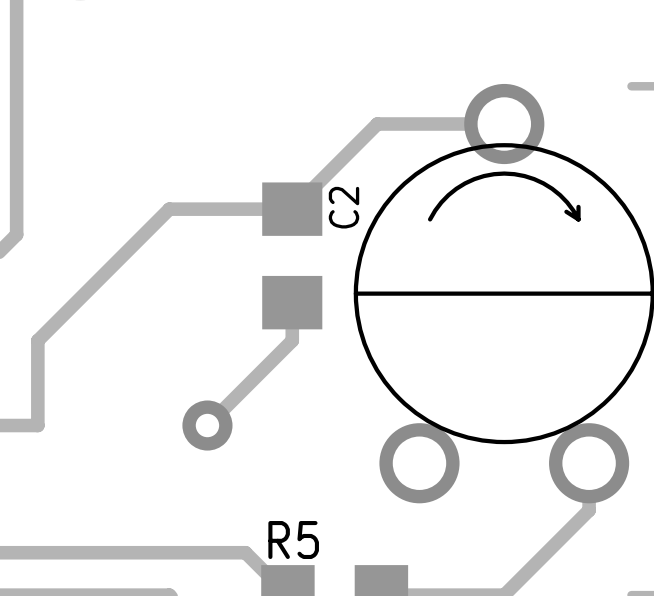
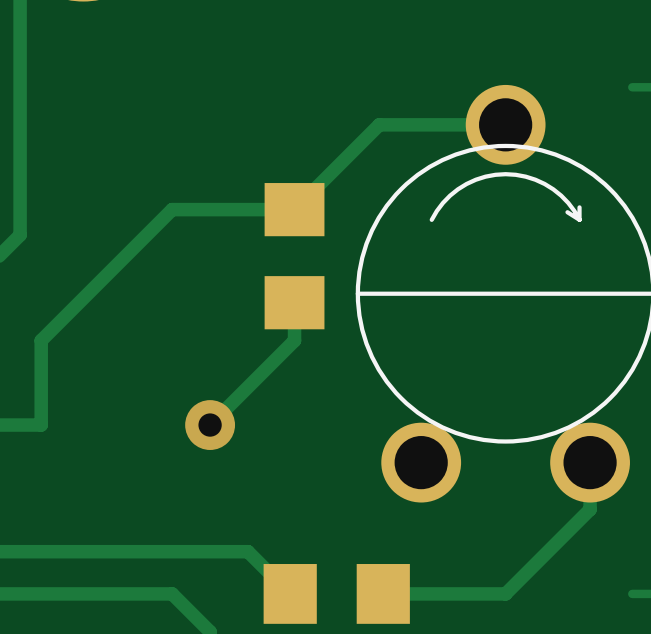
C2 name: C2 (344, 207) -> none
R5 name: R5 (293, 540) -> none

